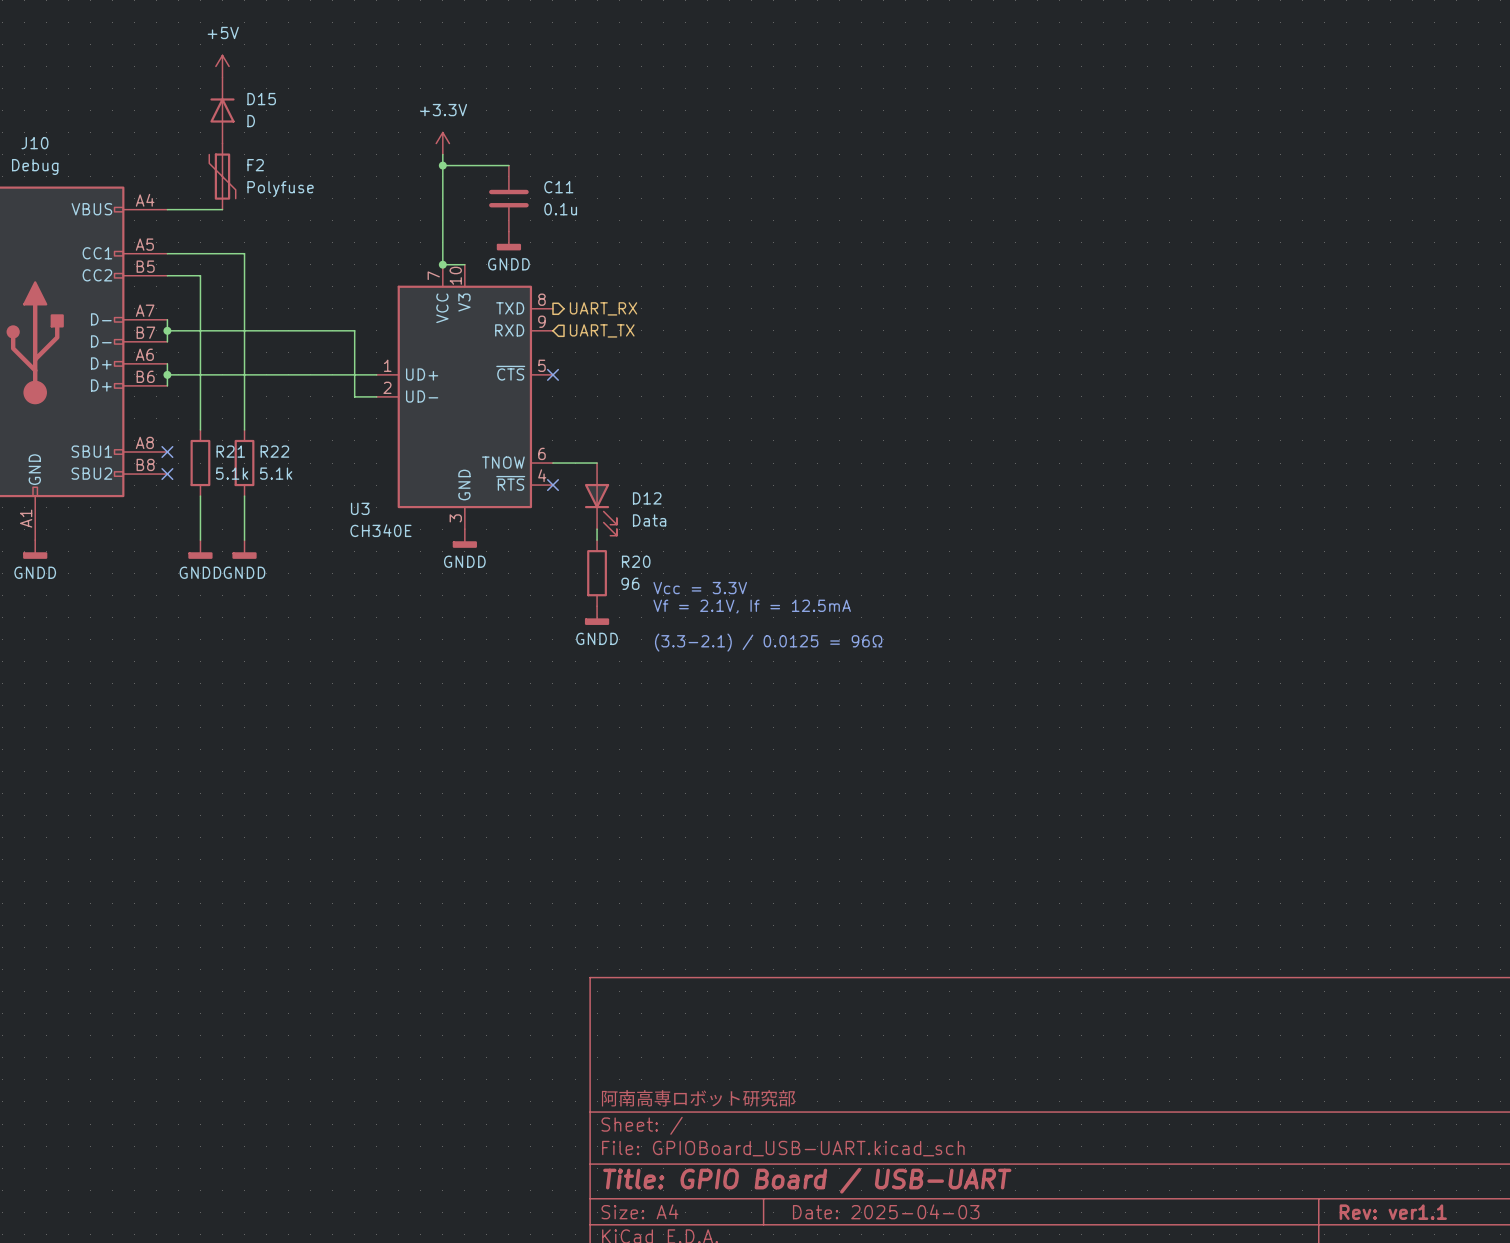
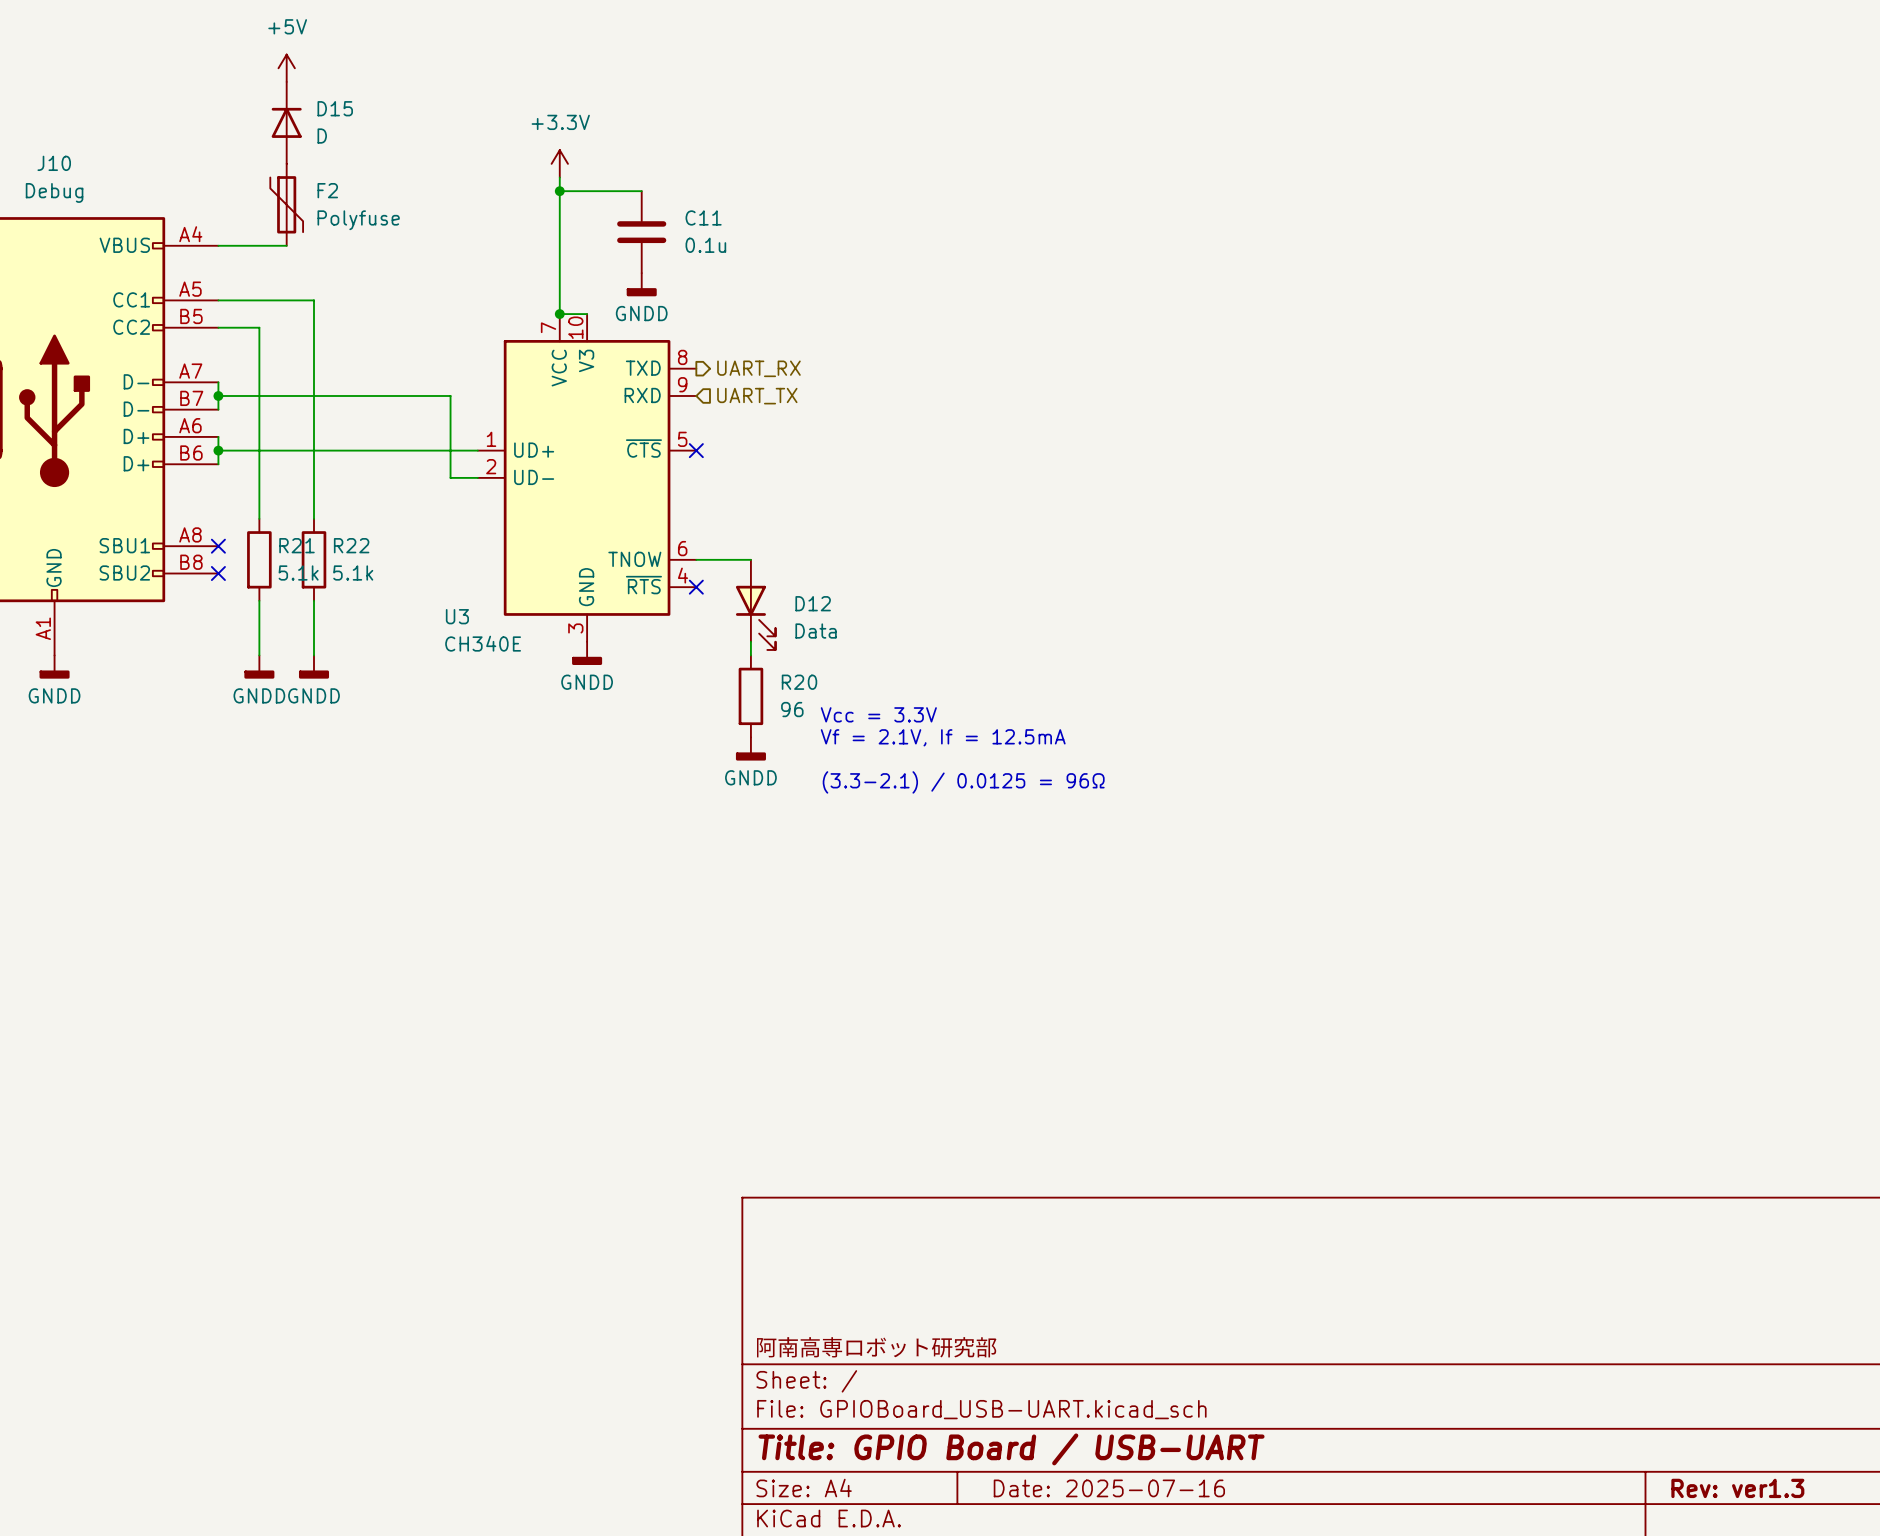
title block: Date: 2025-04-03 (886, 1211) -> Date: 2025-07-16 (1109, 1488)
title block: Rev: ver1.1 (1393, 1212) -> Rev: ver1.3 (1737, 1488)

